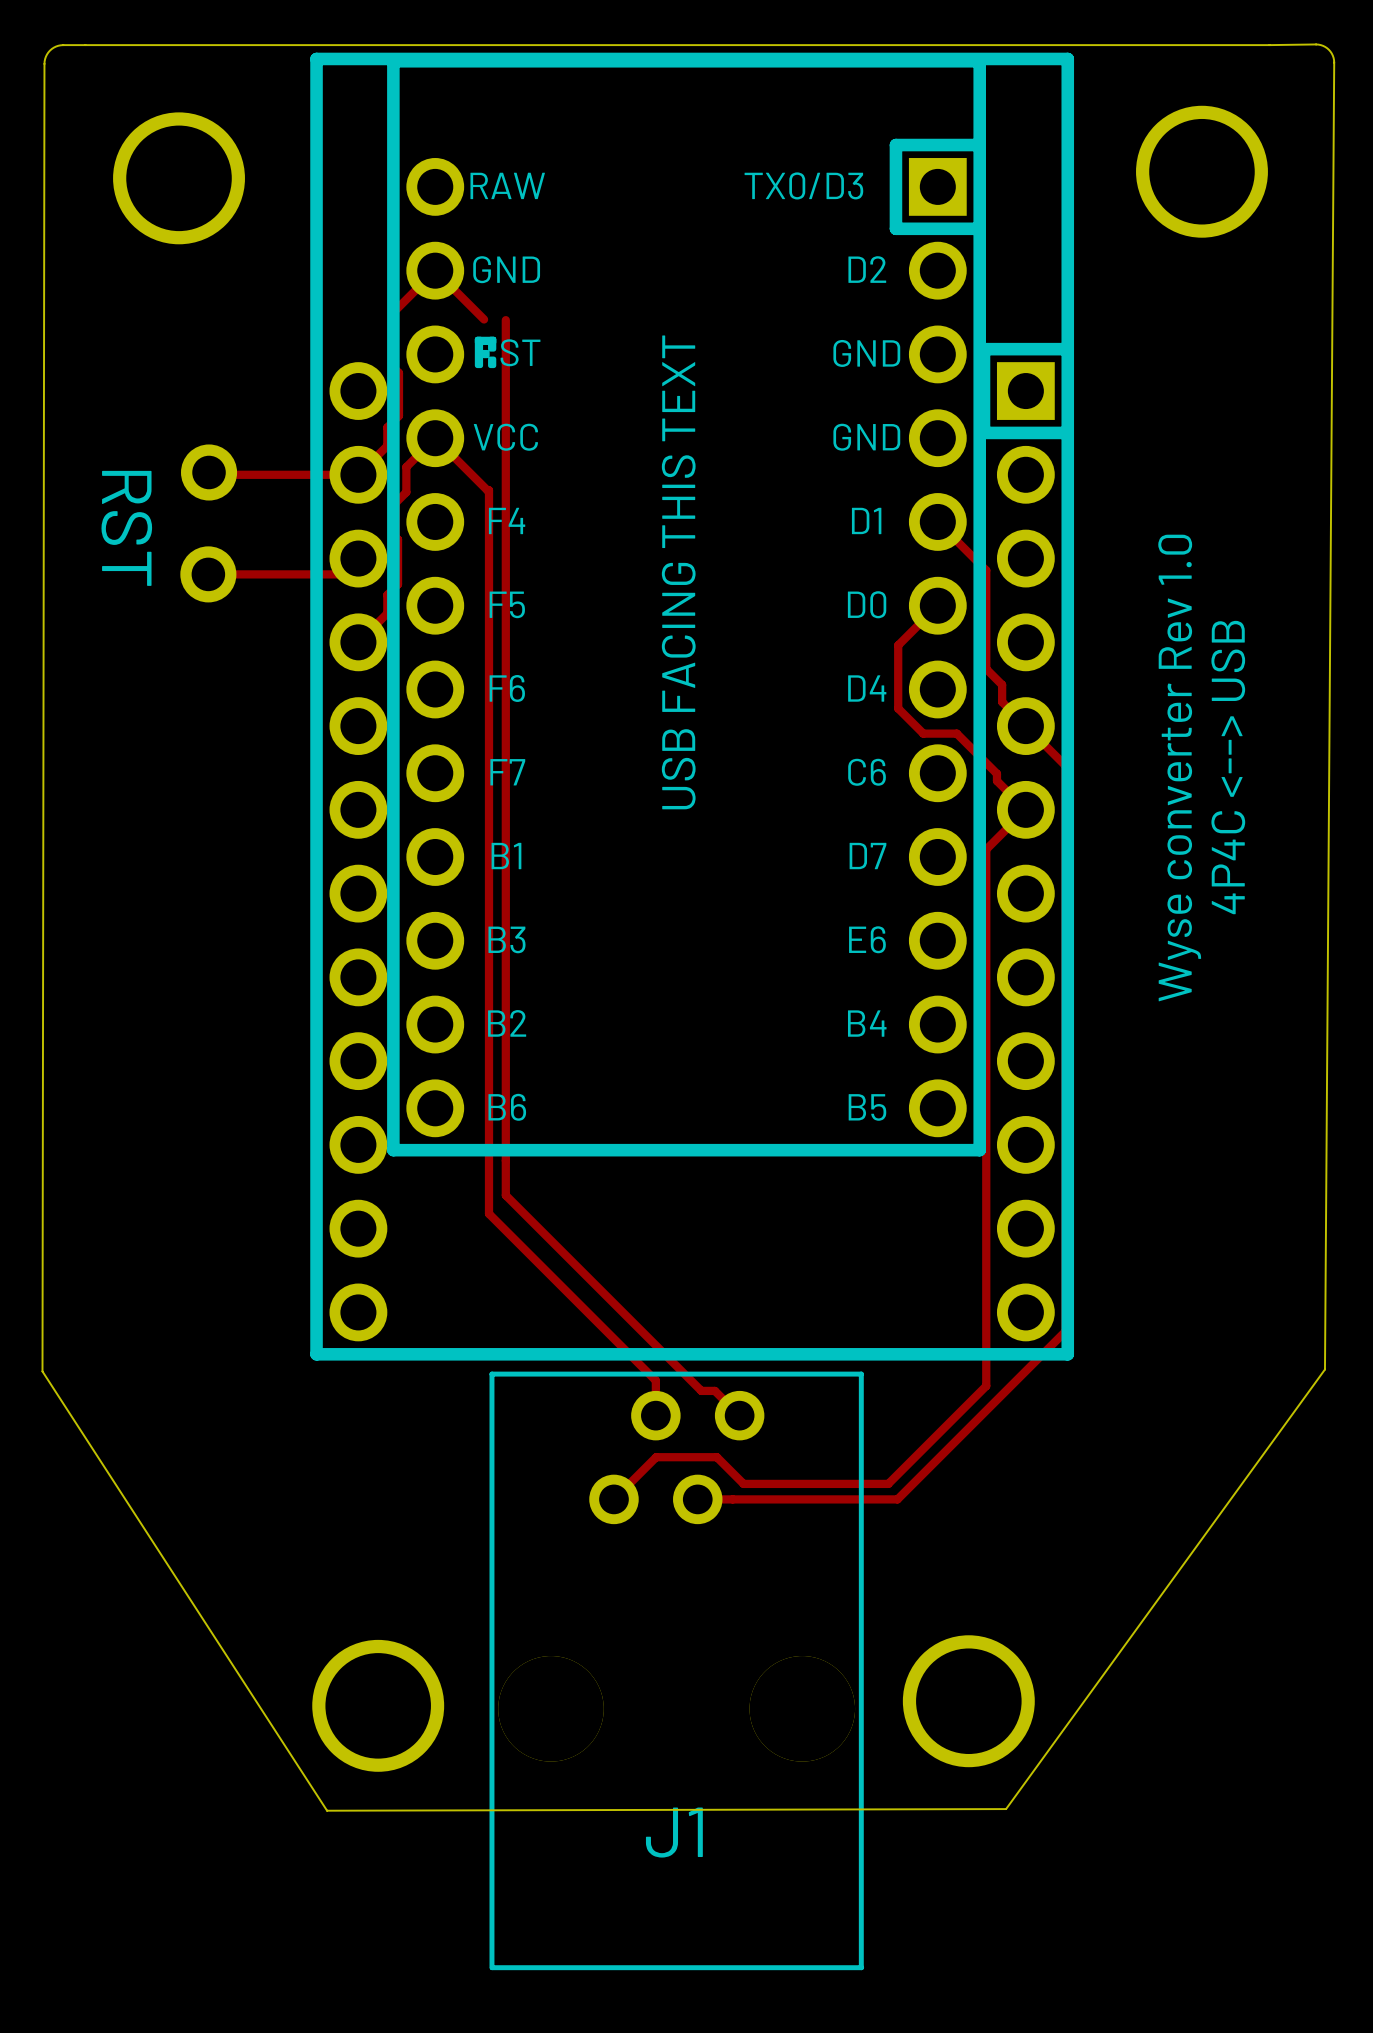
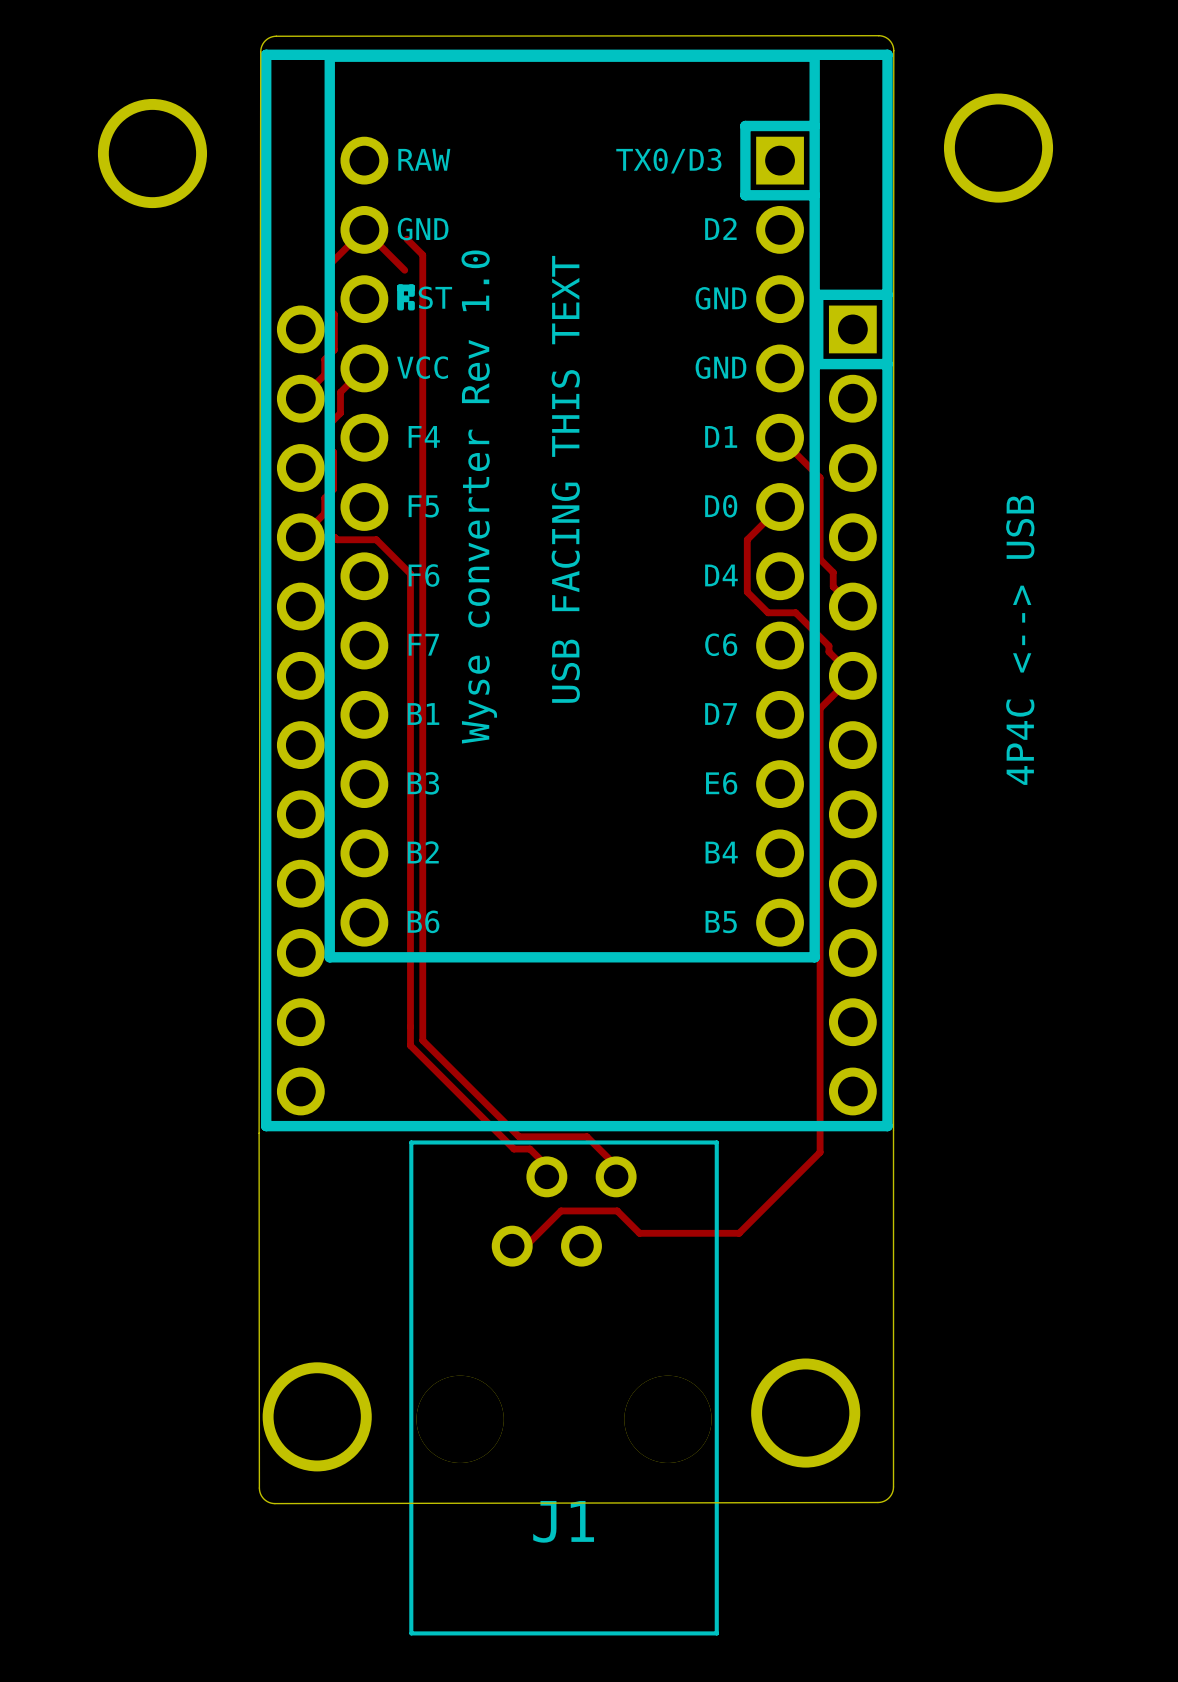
board edge: (1316, 44) (63, 45) (53, 47) (46, 54) (44, 63) (42, 1371) (327, 1810) (1006, 1809) (1324, 1369) (1334, 62) (1328, 49) (1316, 44) -> (878, 35) (276, 36) (268, 38) (261, 45) (259, 1488) (262, 1497) (268, 1502) (877, 1502) (887, 1499) (892, 1492) (893, 50) (889, 40) (878, 35)
track: none -> (406, 239) (422, 254) (422, 270)
track: (435, 438) (489, 490) (489, 1213) (655, 1380) (655, 1415) -> none
track: (209, 472) (211, 474) (358, 474) -> none
part: (209, 472) -> none
text: RST (126, 528) -> none
track: (358, 558) (342, 574) (208, 574) -> none
part: (208, 574) -> none
track: none -> (300, 537) (376, 539) (410, 573) (410, 1045) (513, 1149) (529, 1149) (559, 1178)
track: (1025, 726) (1065, 765) (1065, 1331) (897, 1499) (697, 1499) -> none
text position: Wyse converter Rev 1.0 (1179, 768) -> Wyse converter Rev 1.0 (479, 497)
track: (505, 1195) (701, 1390) (714, 1390) (739, 1415) -> (422, 994) (422, 1040) (519, 1136) (586, 1136) (628, 1178)
track: (767, 1483) (743, 1483) (716, 1457) (656, 1457) (613, 1499) -> (639, 1233) (617, 1210) (561, 1210) (524, 1247)

